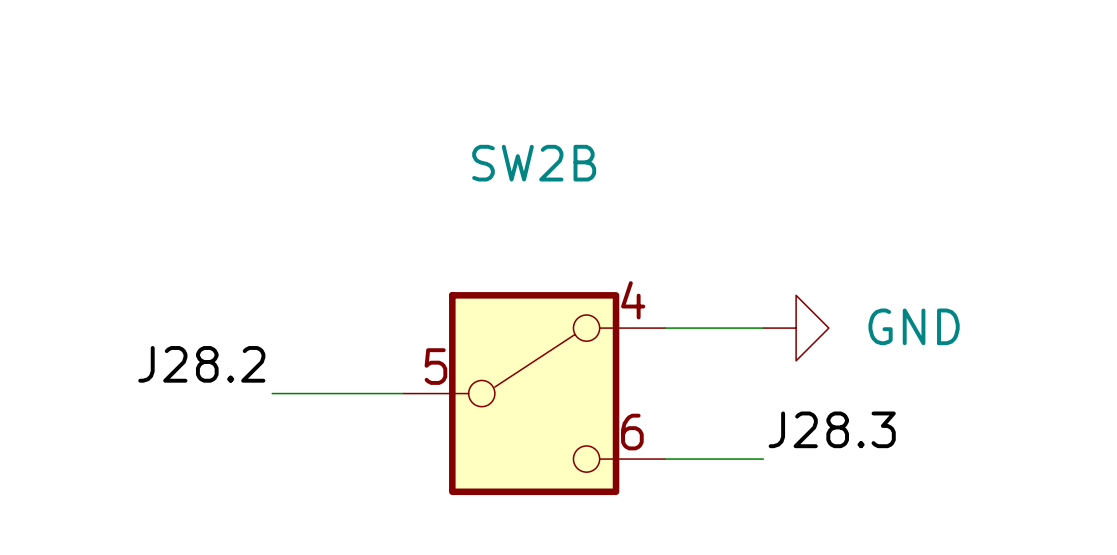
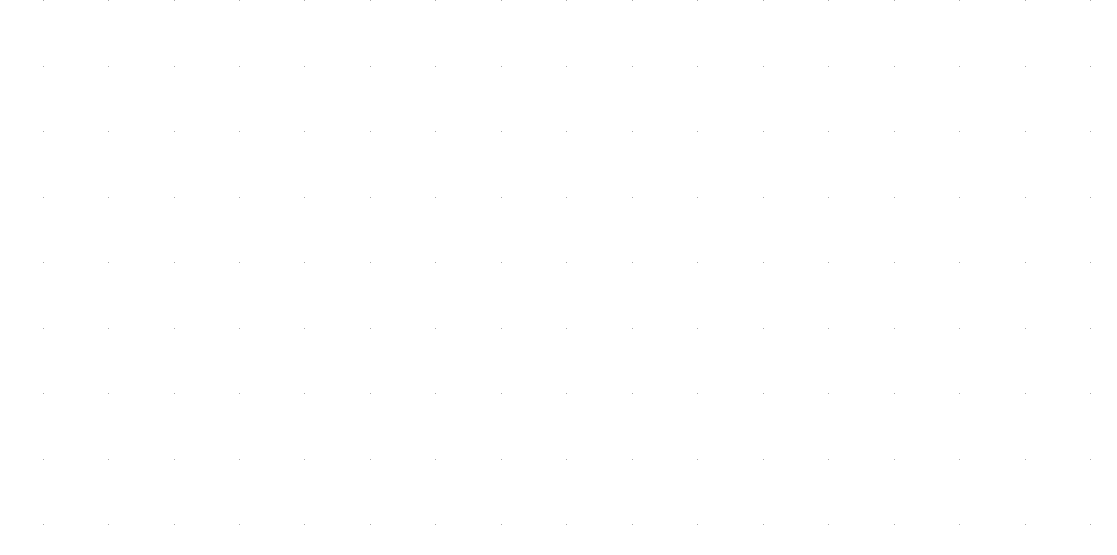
wire: (665, 328) (763, 328) -> none
power symbol: GND (796, 328) -> none
label: J28.2 (201, 364) -> none
wire: (272, 393) (403, 393) -> none
SW2B: (534, 393) -> none
label: J28.3 (832, 429) -> none
wire: (665, 459) (763, 459) -> none

